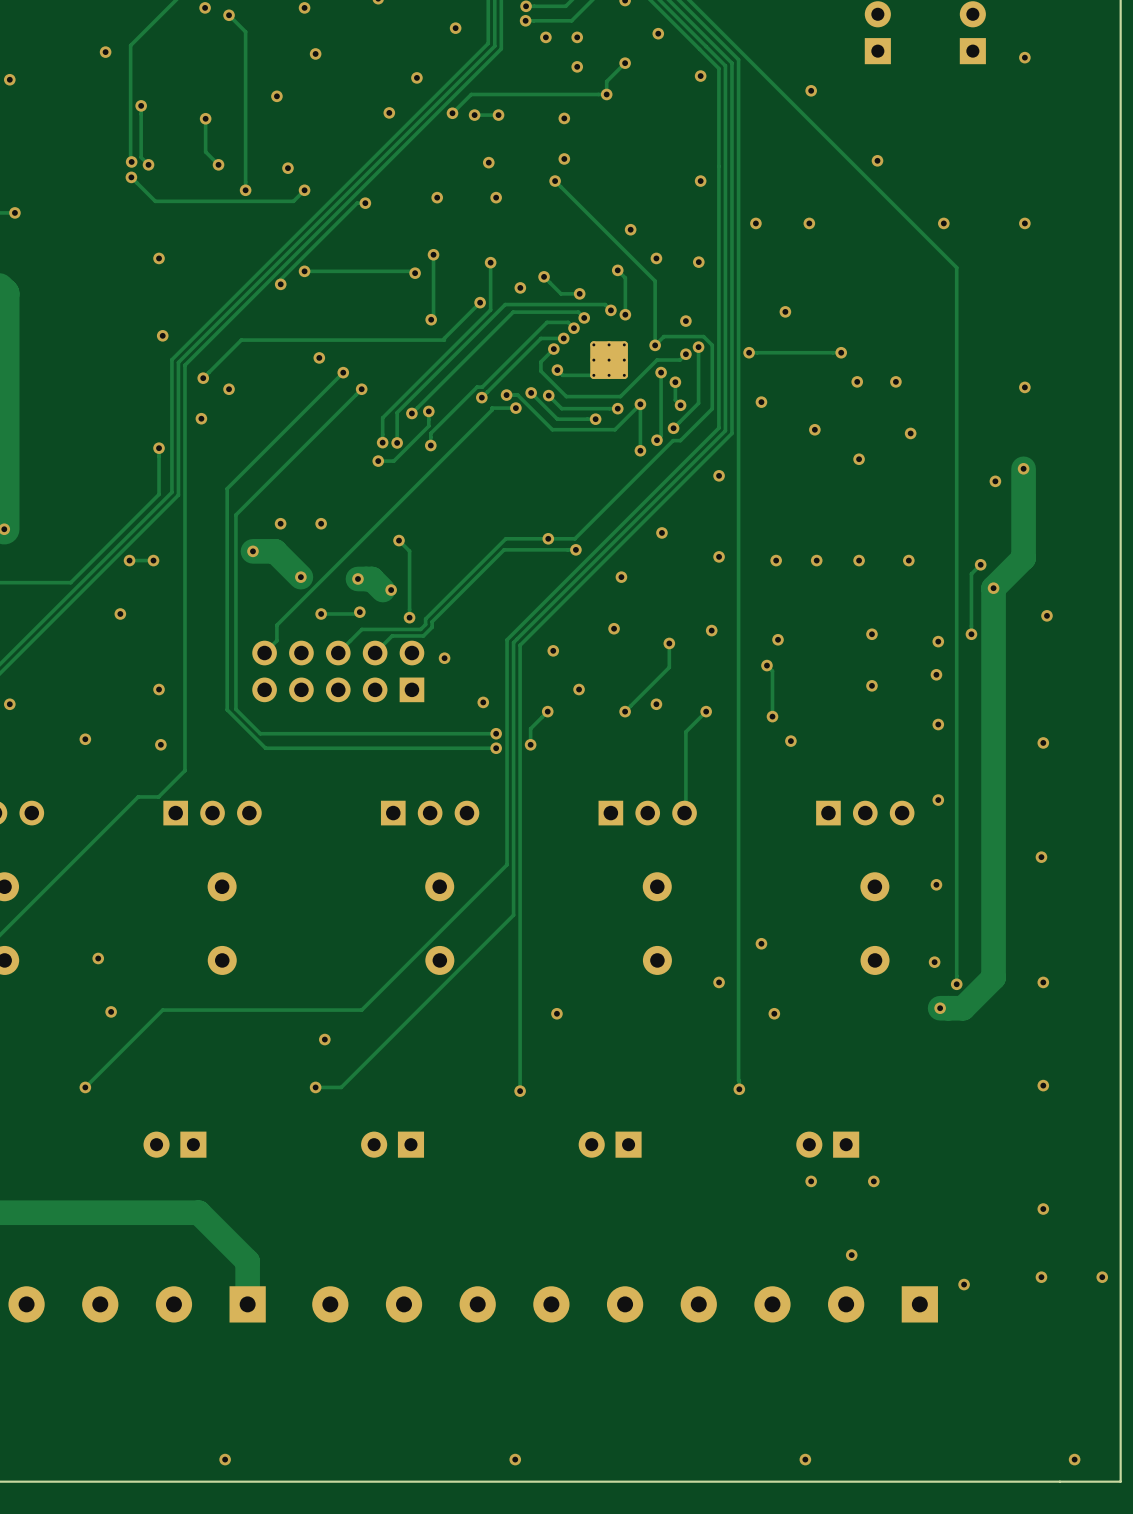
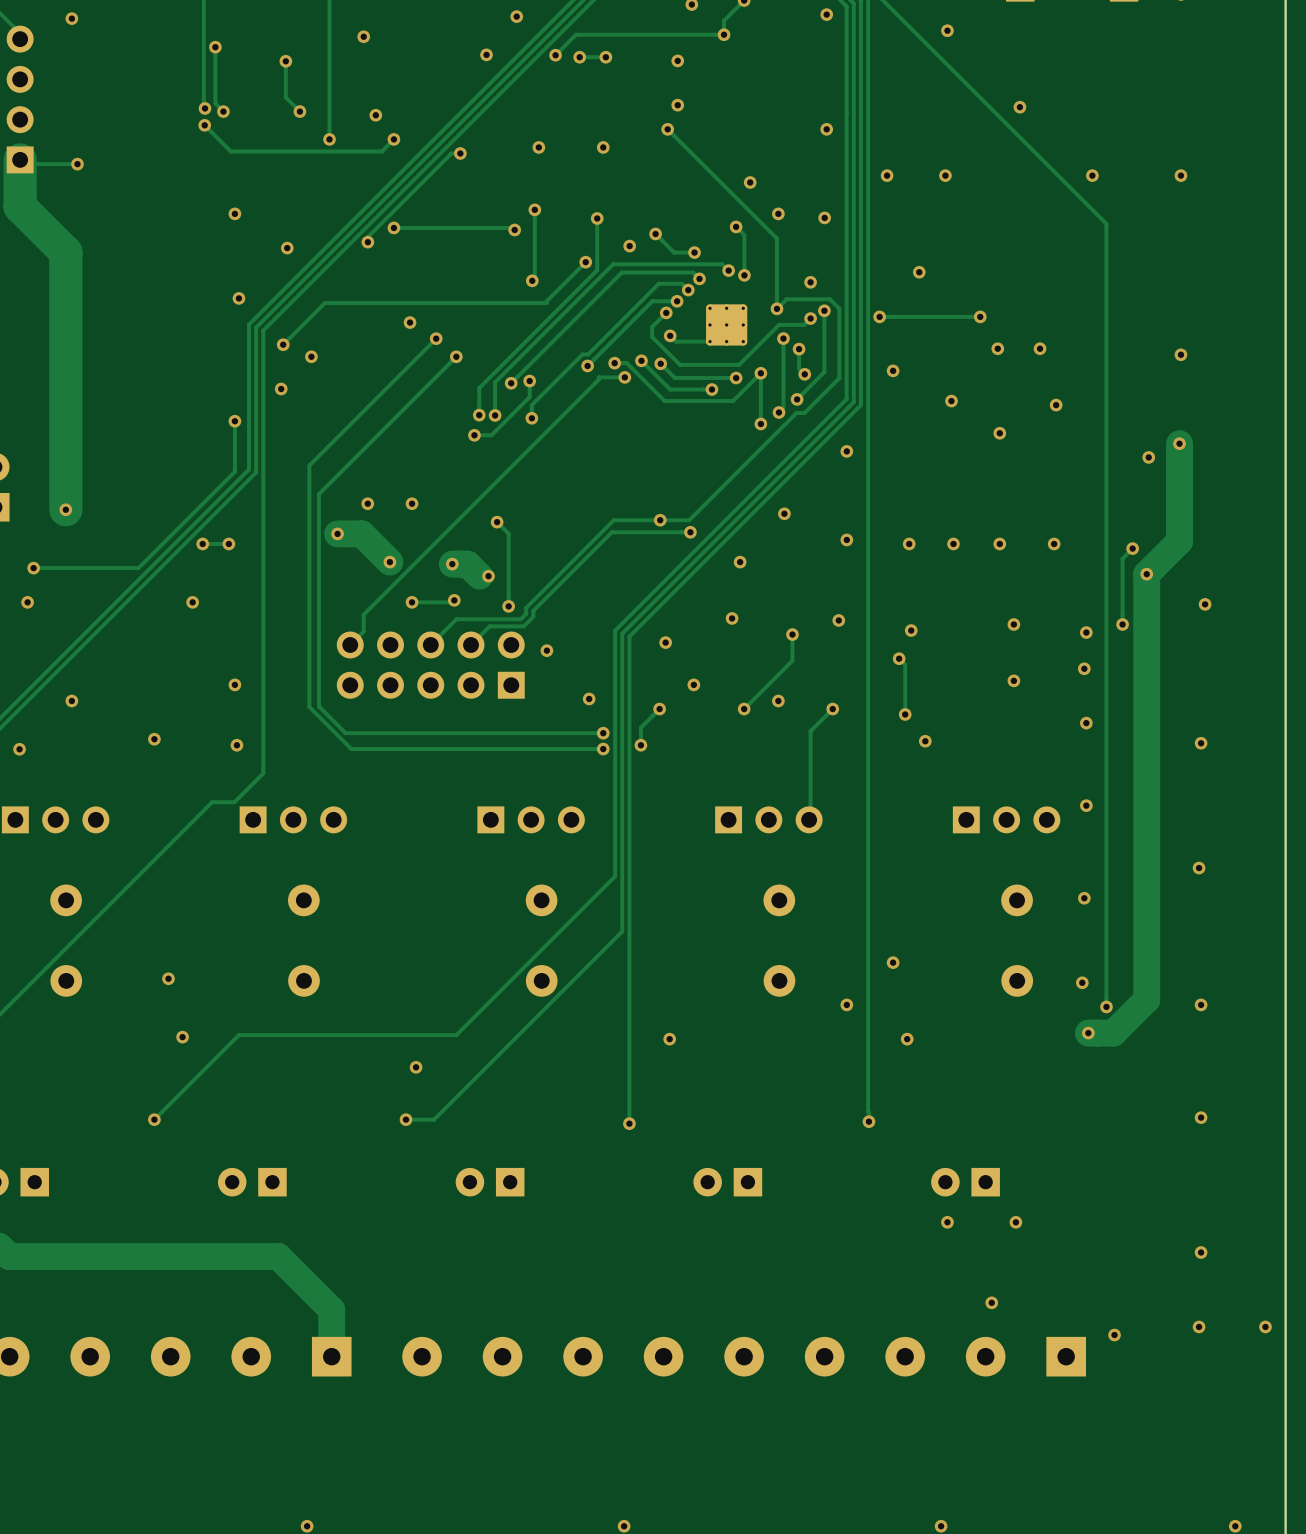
via: (488, 162) -> none
via: none -> (287, 248)

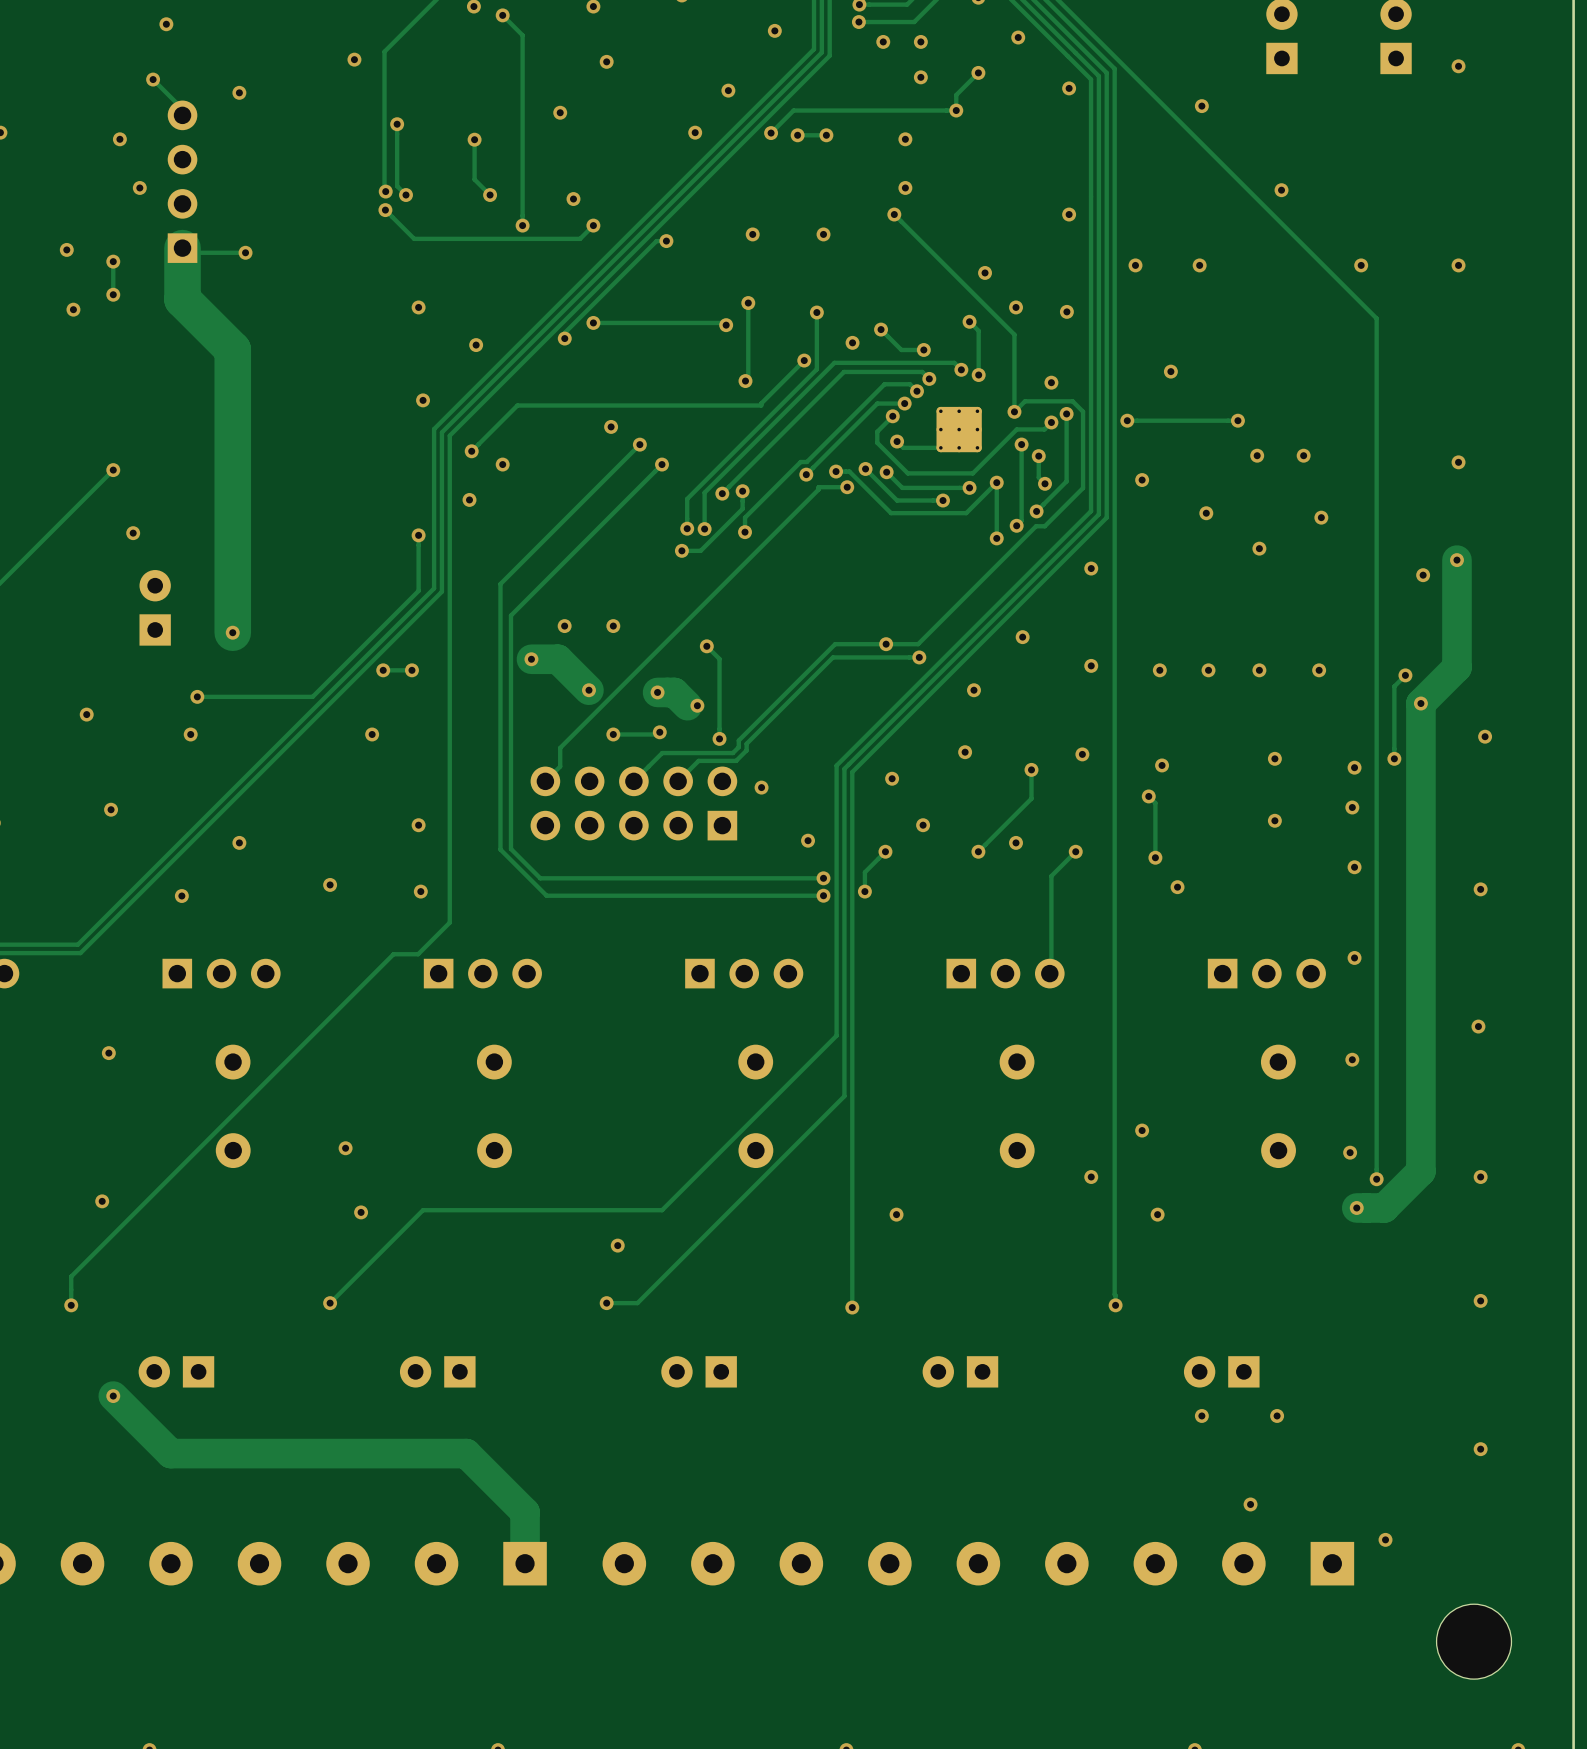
via: (1199, 1326) -> none
via: (1265, 1326) -> none
part: none -> (1474, 1641)

